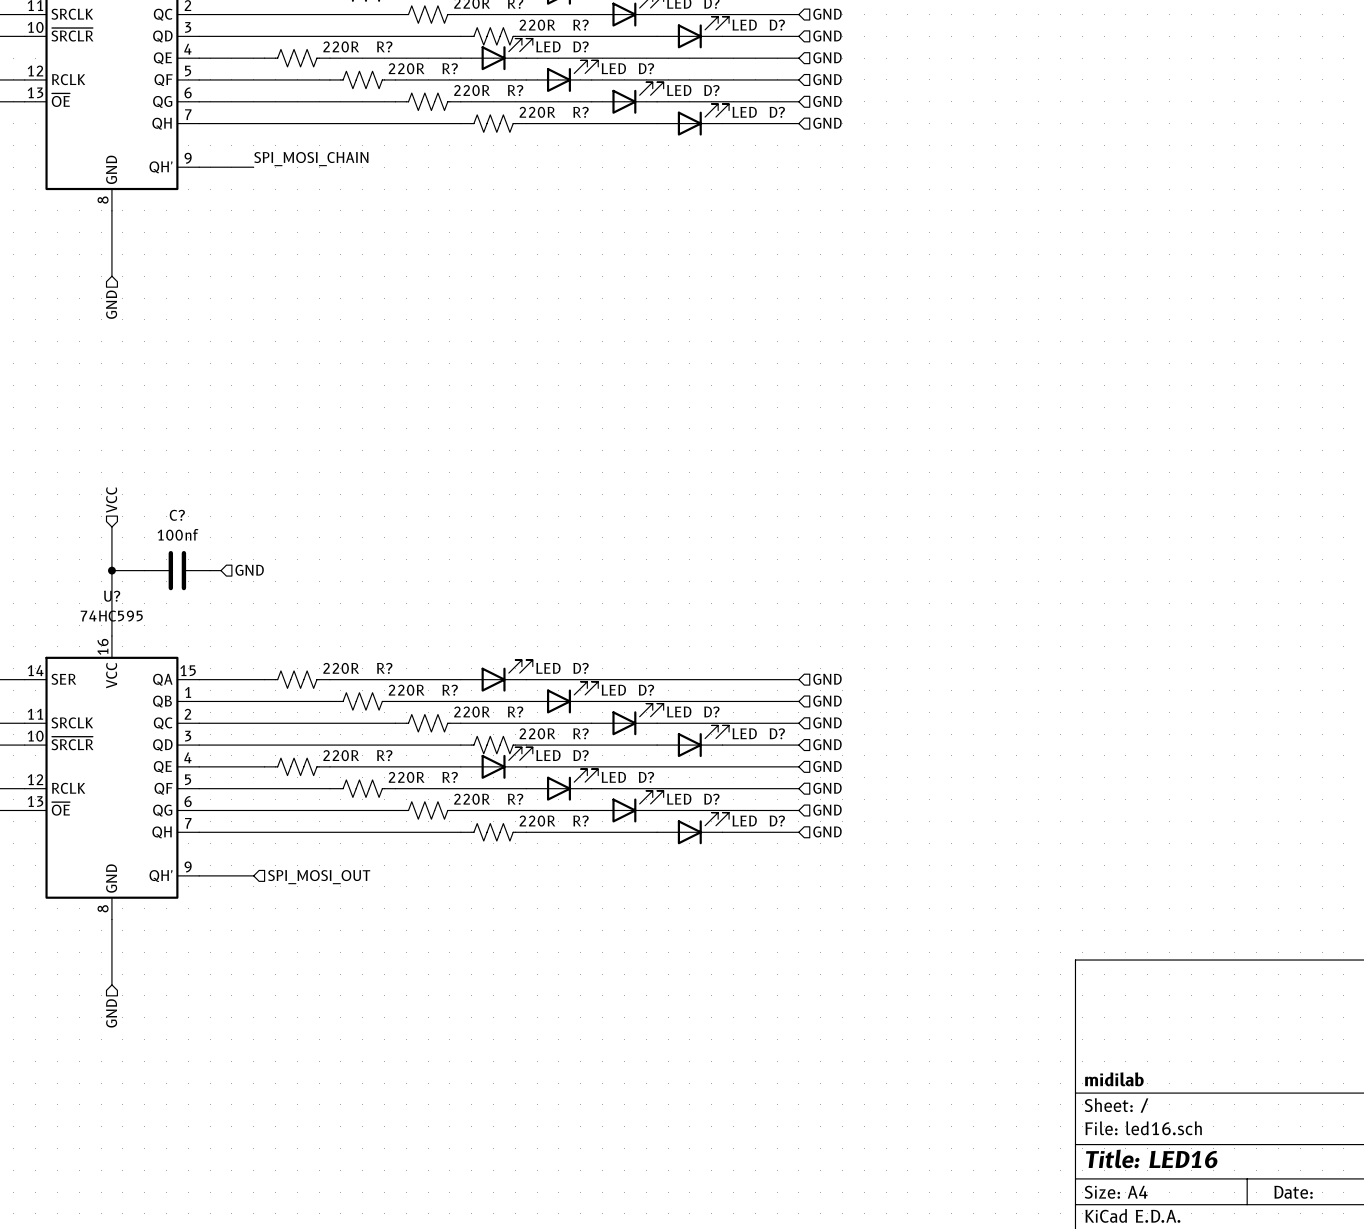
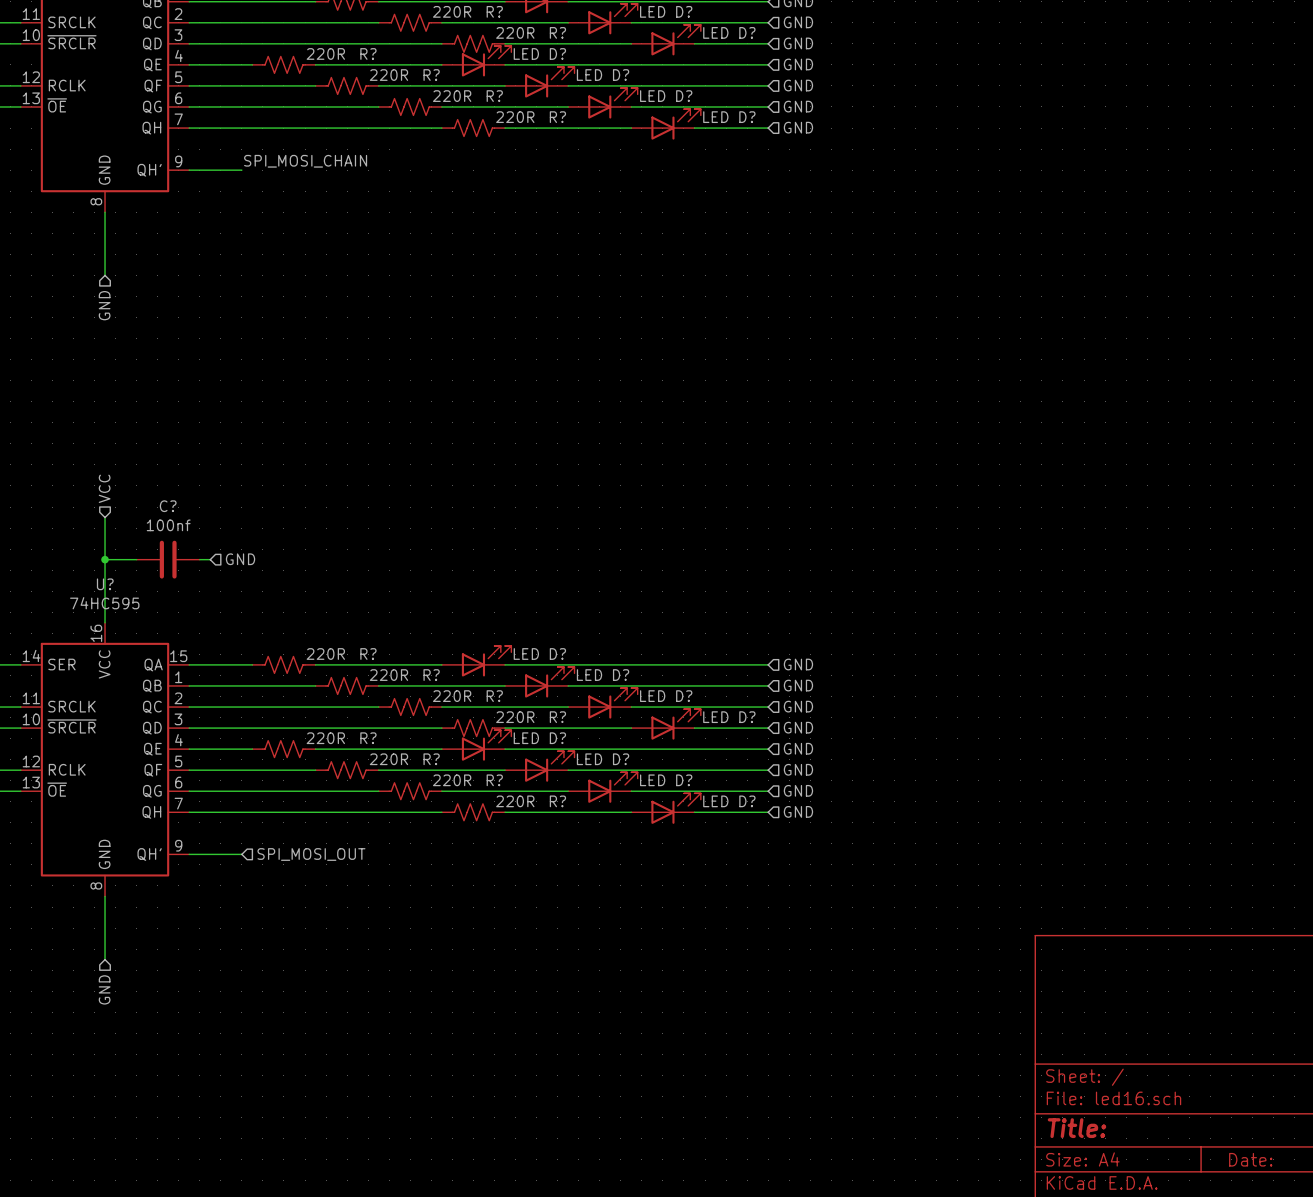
title block: midilab (1114, 1079) -> none
title block: Title: LED16 (1151, 1158) -> Title: (1076, 1128)

